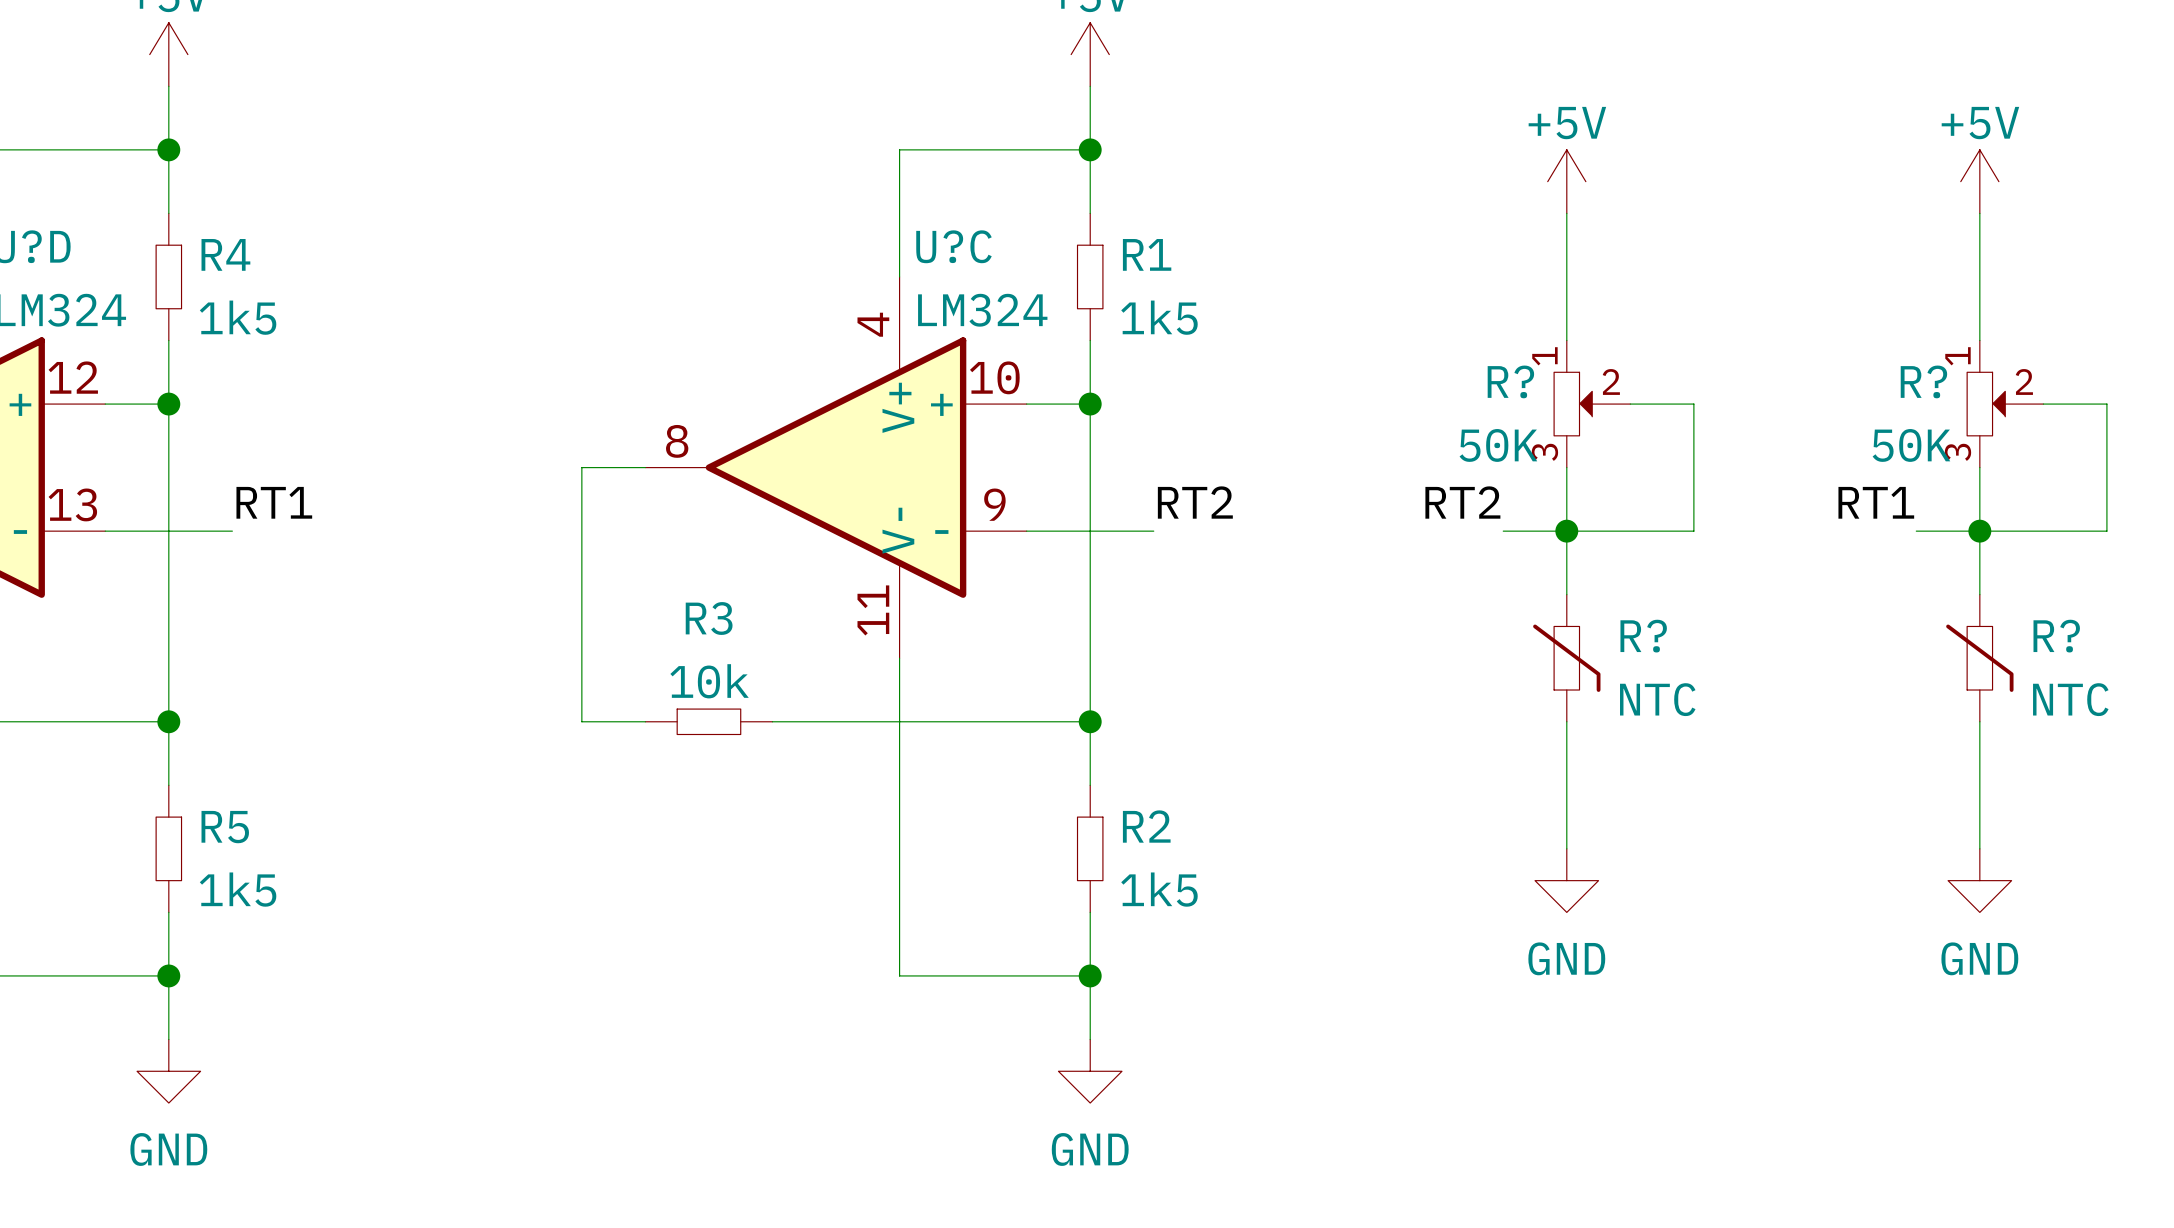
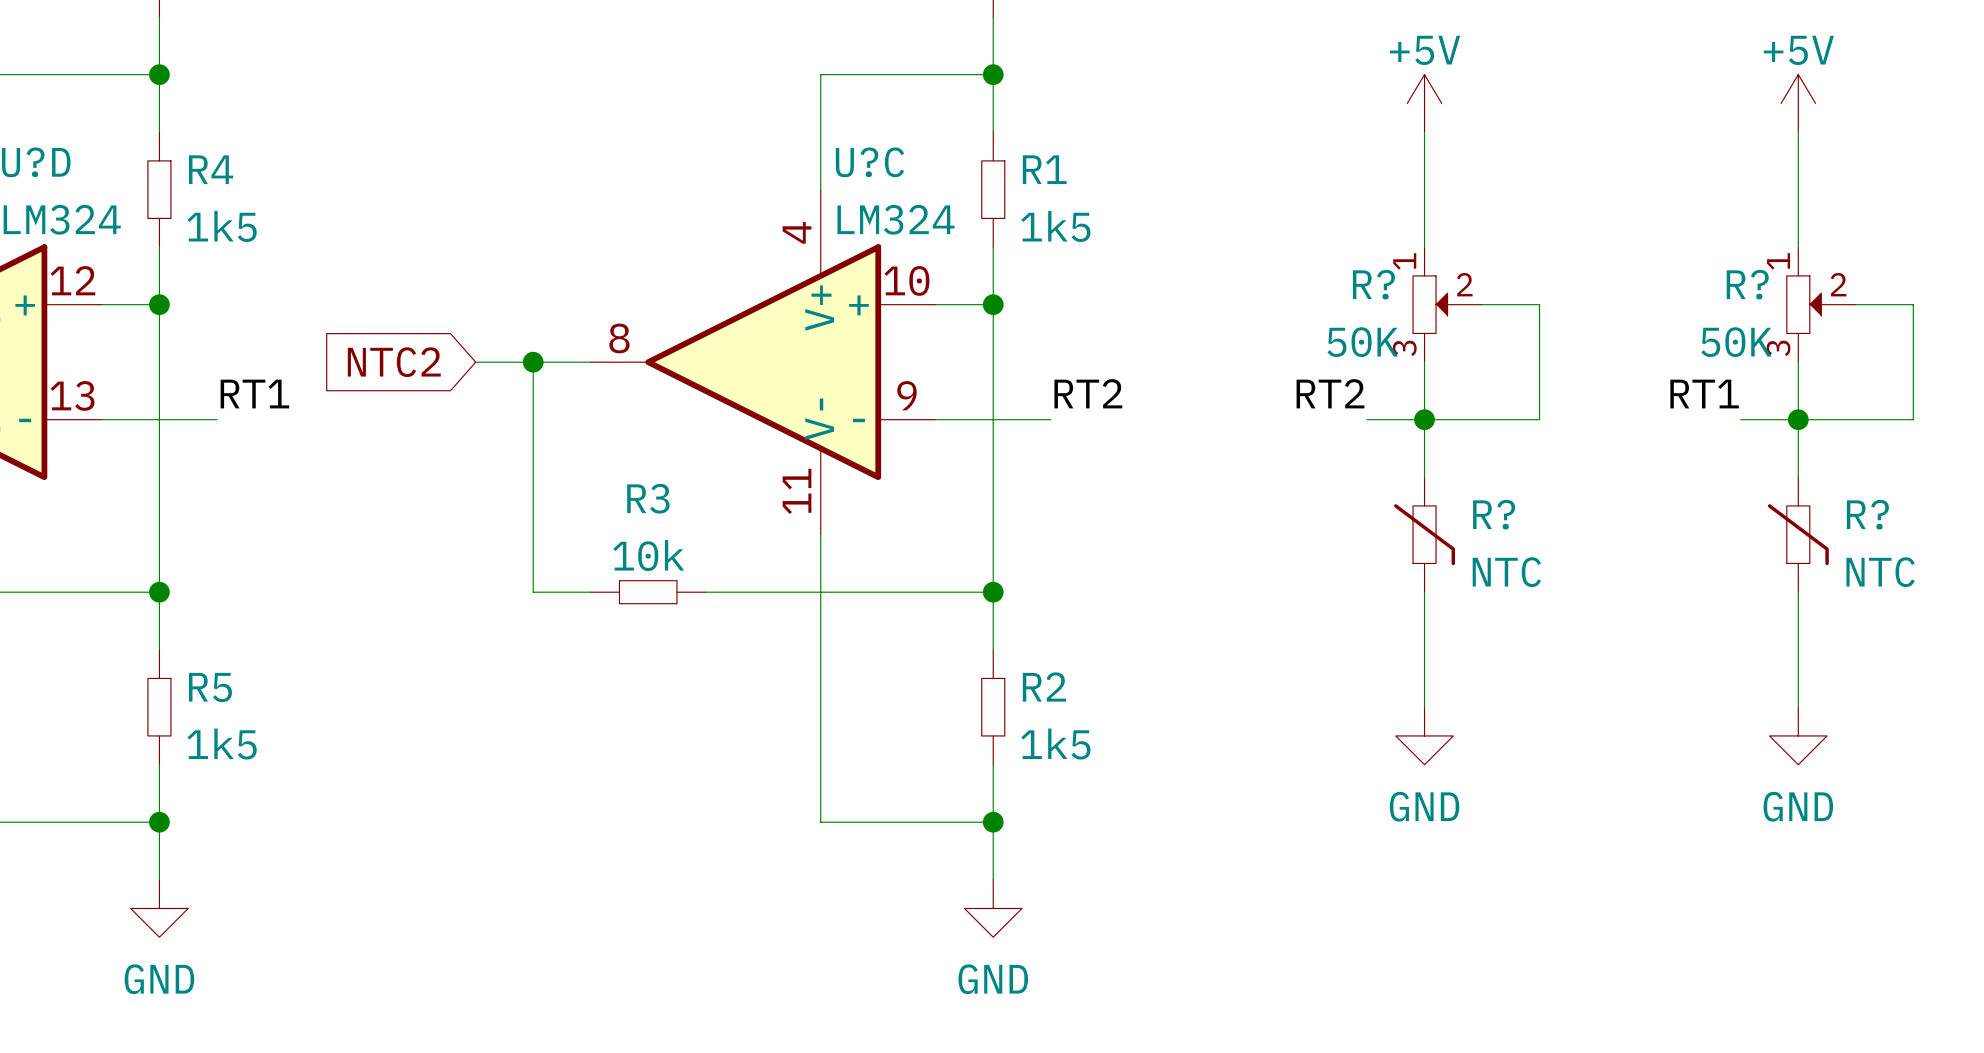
global label: none -> NTC2 (394, 362)
wire: none -> (475, 362) (533, 362)
junction: none -> (533, 362)

